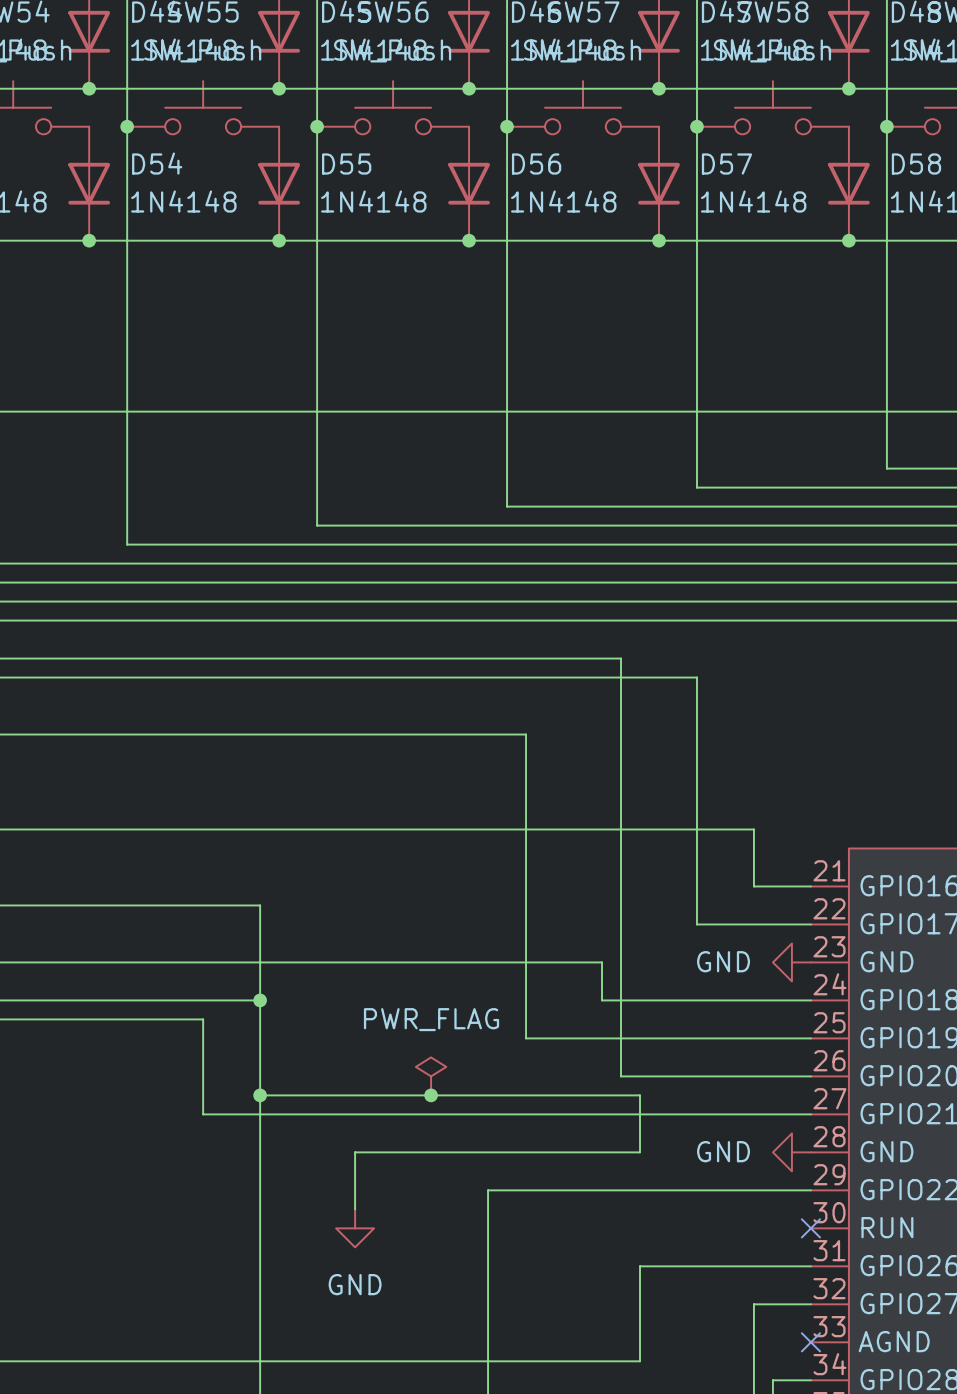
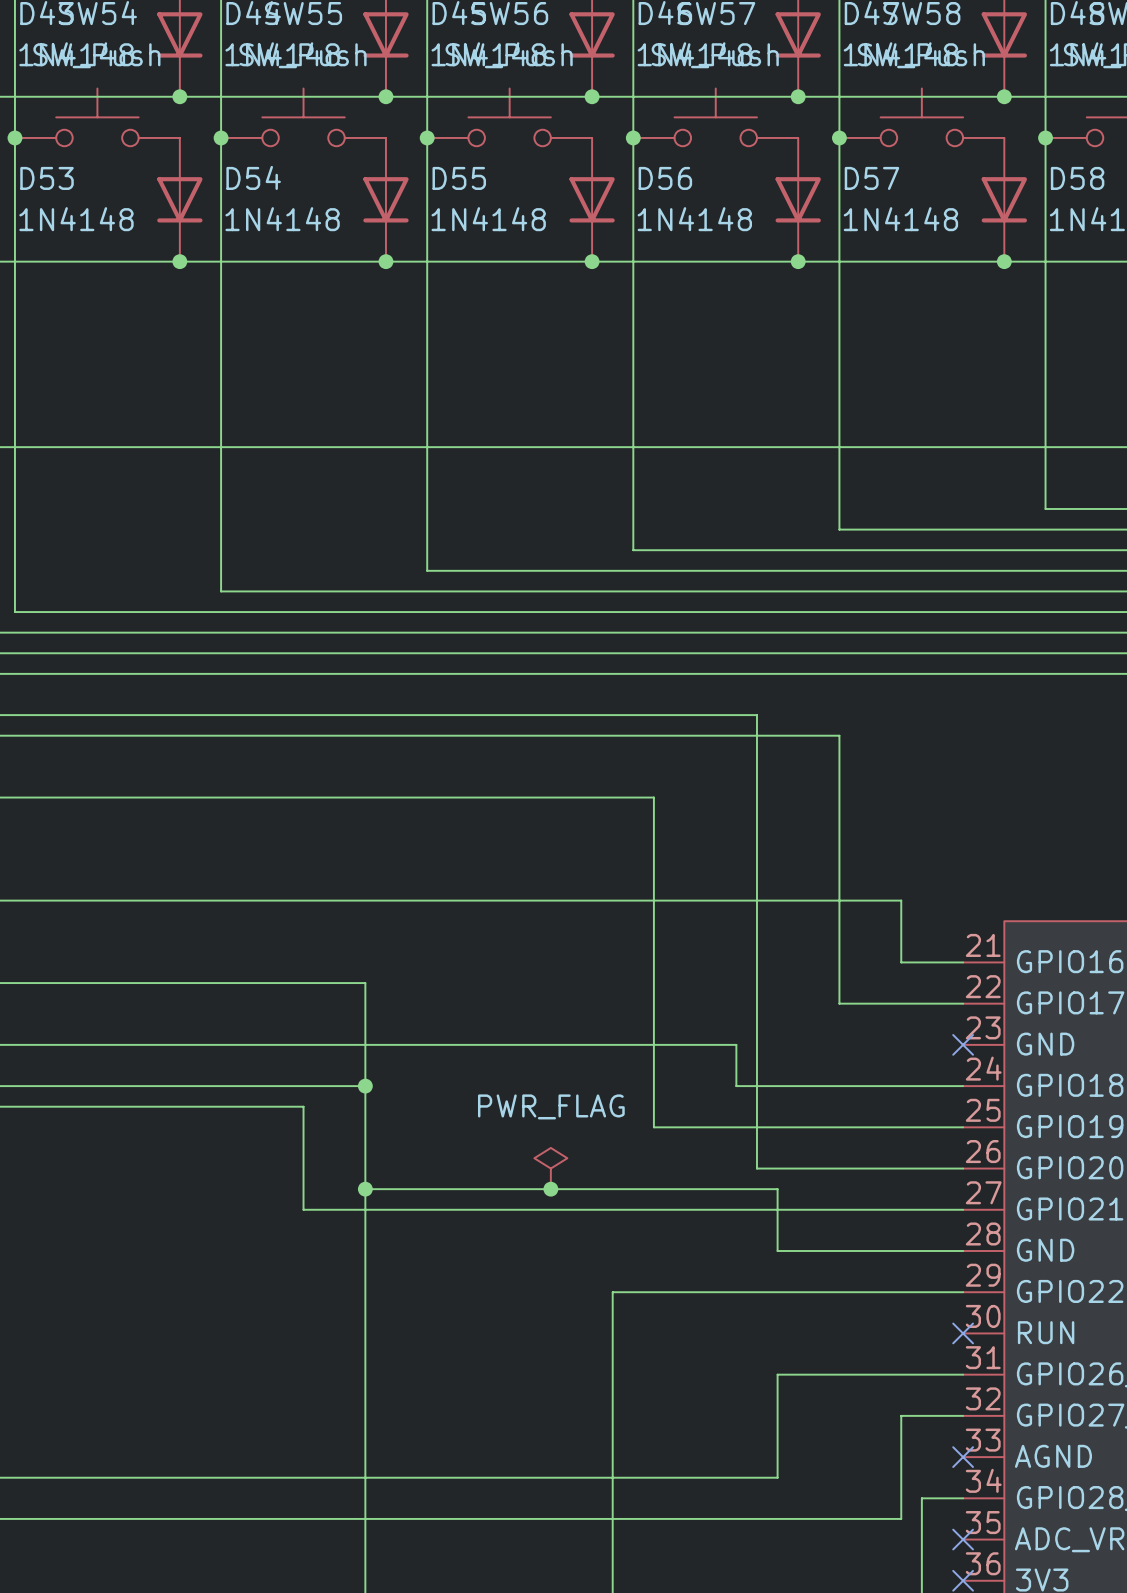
power symbol: GND (791, 962) -> none
no-connect mark: none -> (963, 1044)
wire: (640, 1152) (355, 1152) (355, 1209) -> (777, 1250) (963, 1250)
power symbol: GND (791, 1152) -> none
power symbol: GND (355, 1228) -> none

